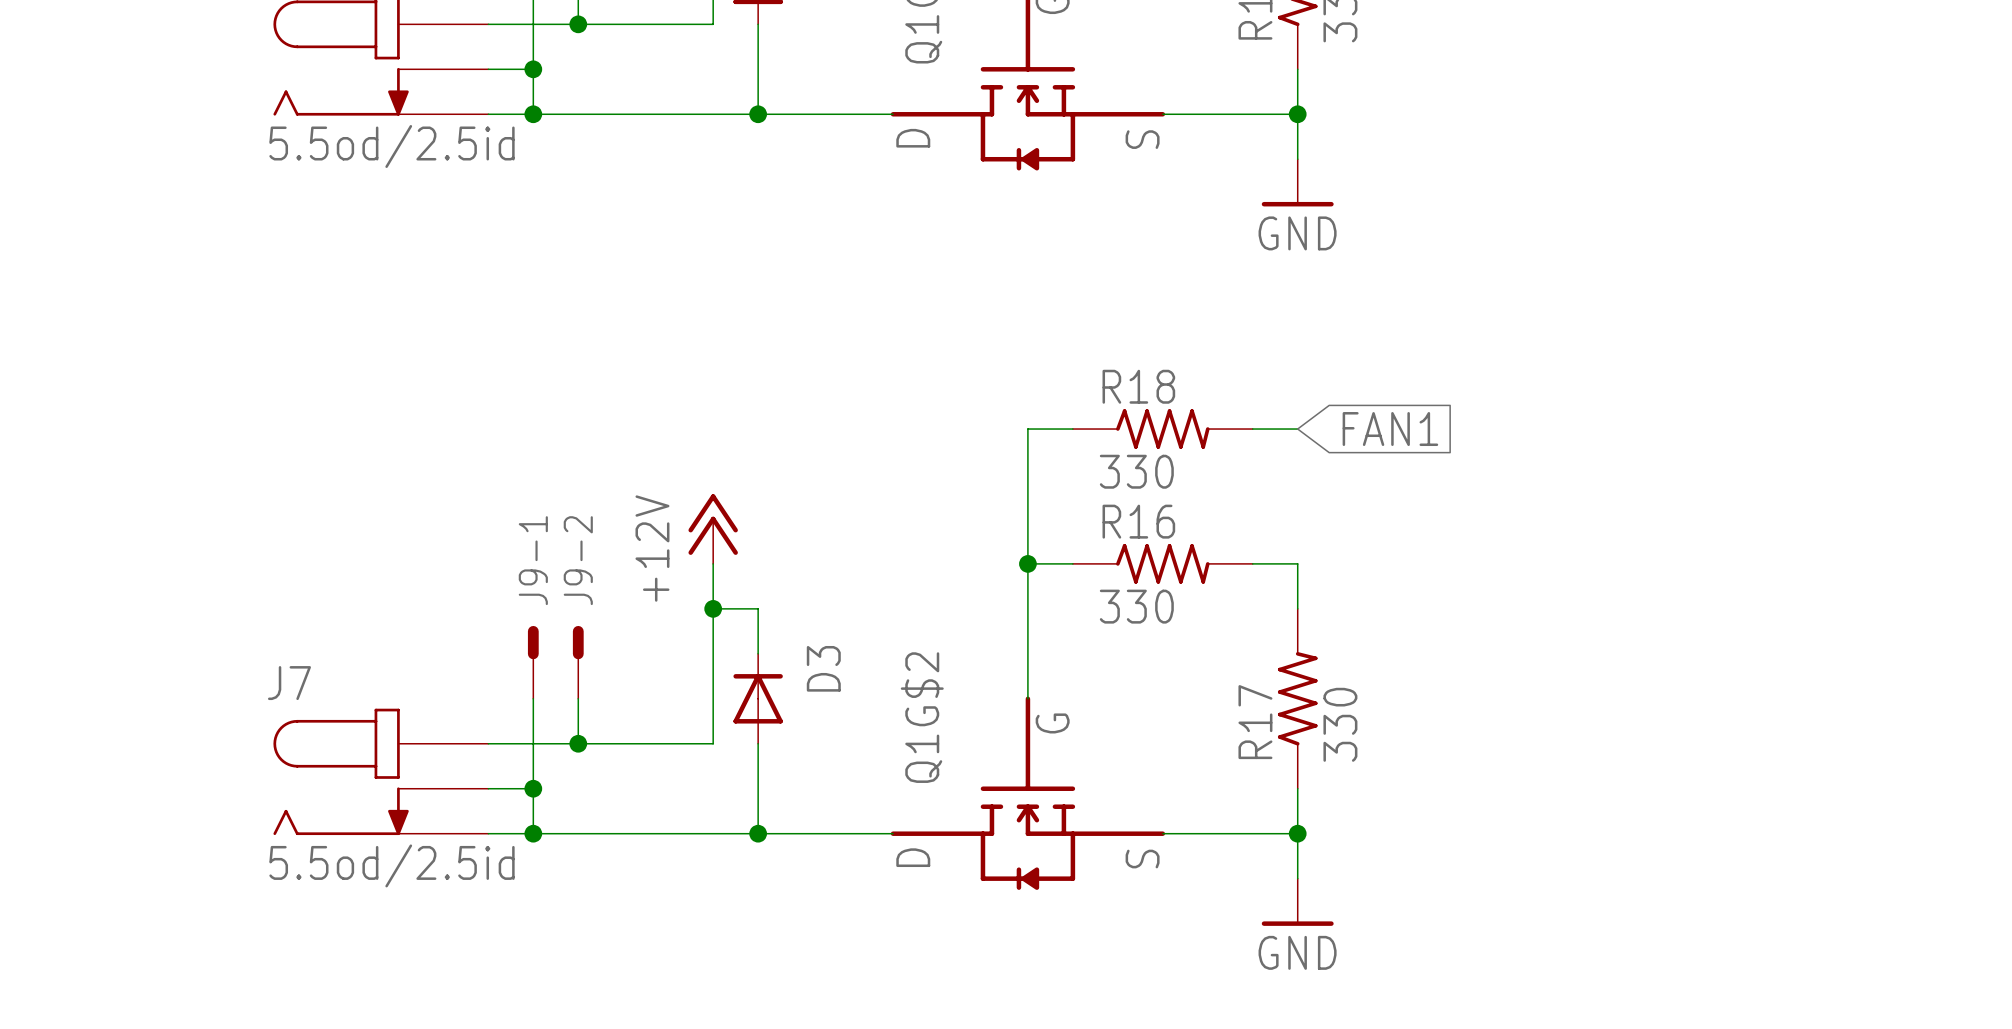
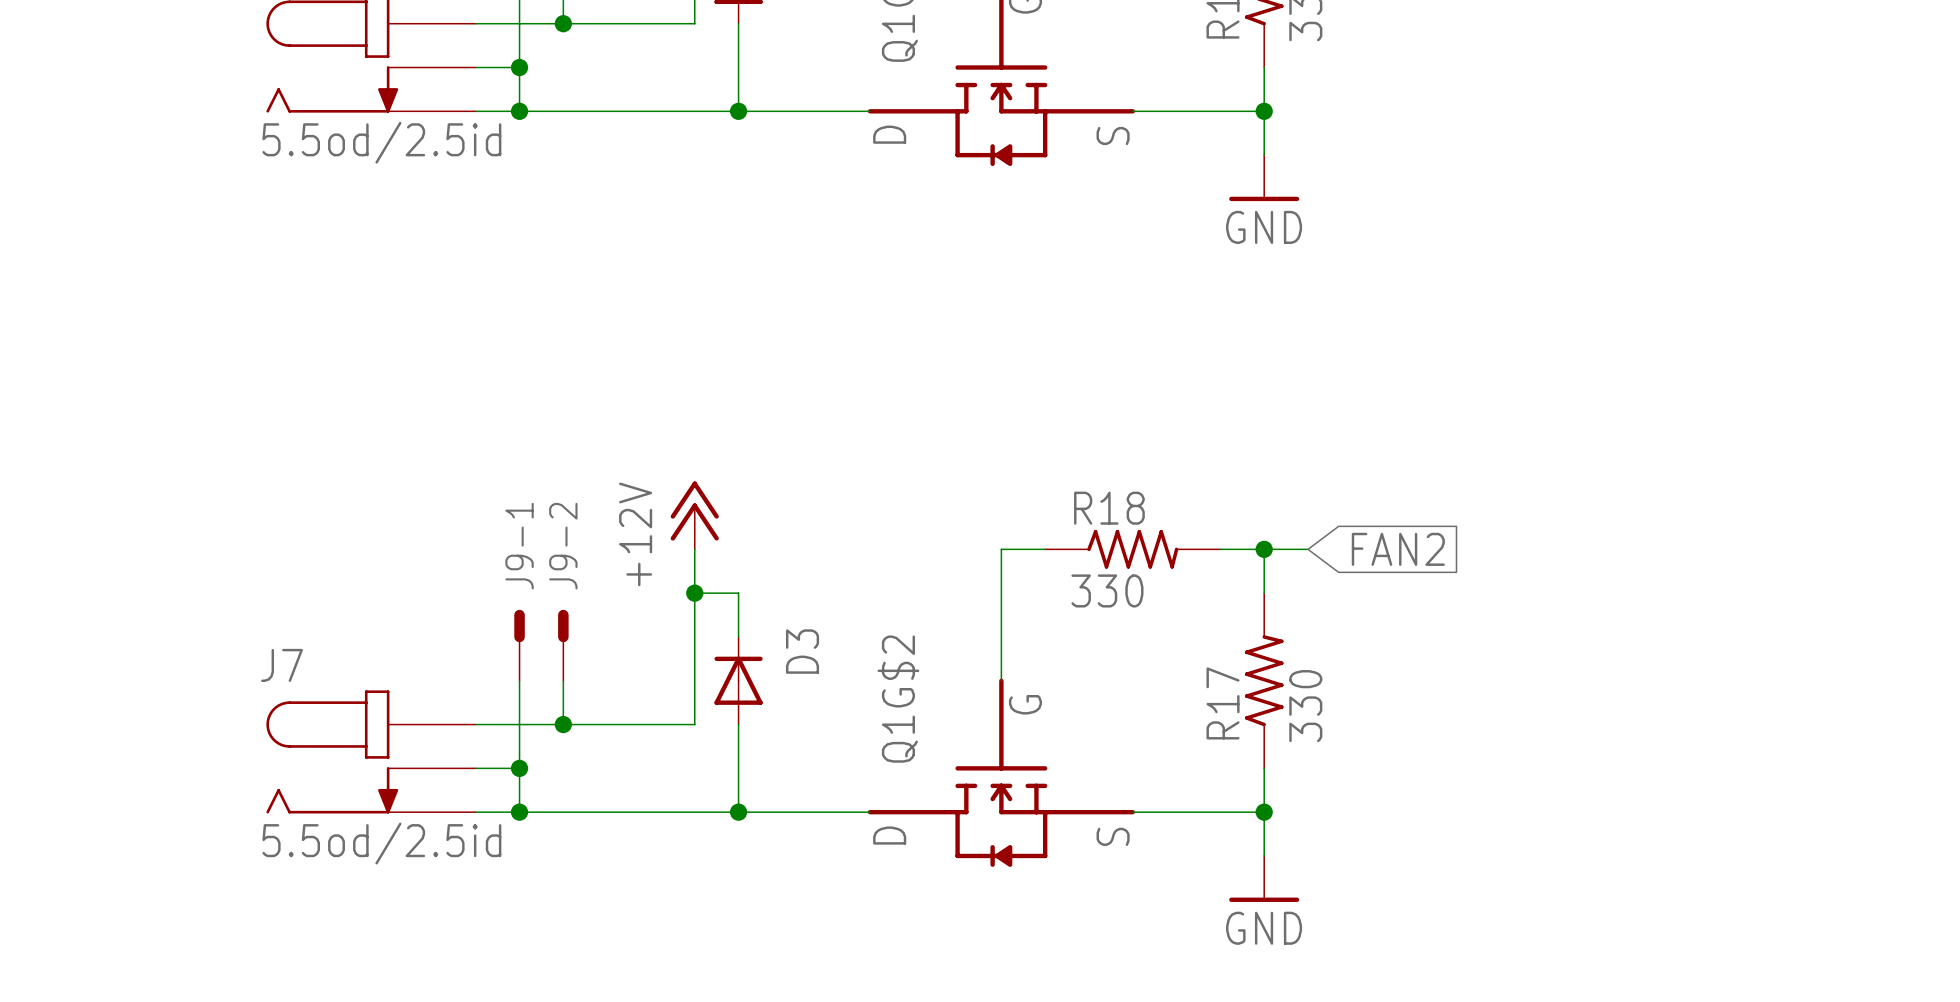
wire: (1072, 429) (1027, 429) (1027, 563) -> none
R18: 330 (1162, 429) -> none
wire: (1252, 429) (1297, 429) -> (1264, 549) (1308, 549)
global label: FAN1 (1390, 429) -> none
R16 name: R16 (1138, 521) -> R18 (1109, 508)
junction: (1027, 563) -> none
junction: none -> (1264, 549)
global label: none -> FAN2 (1398, 549)

